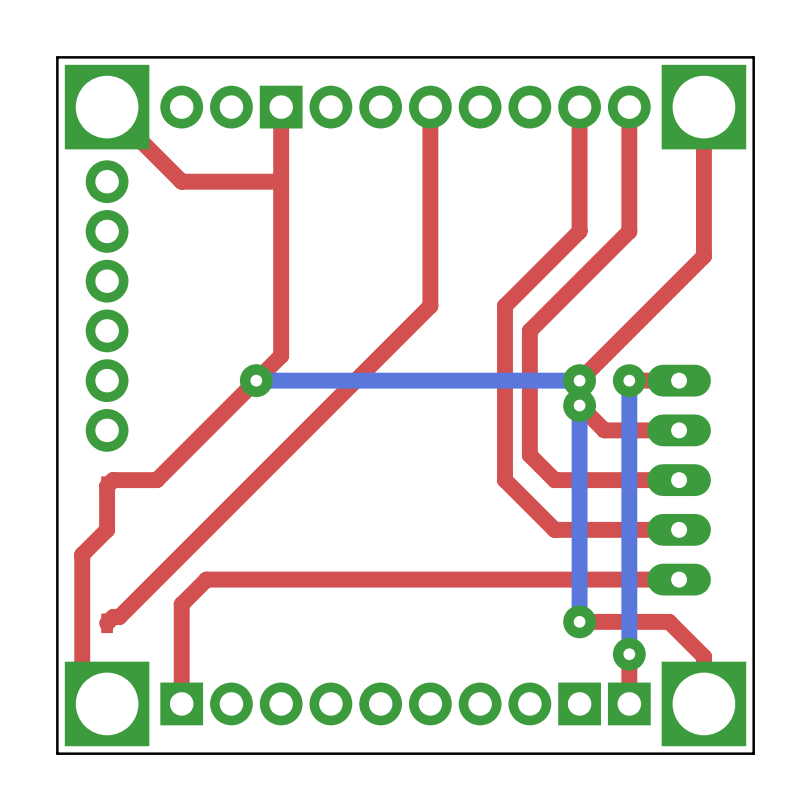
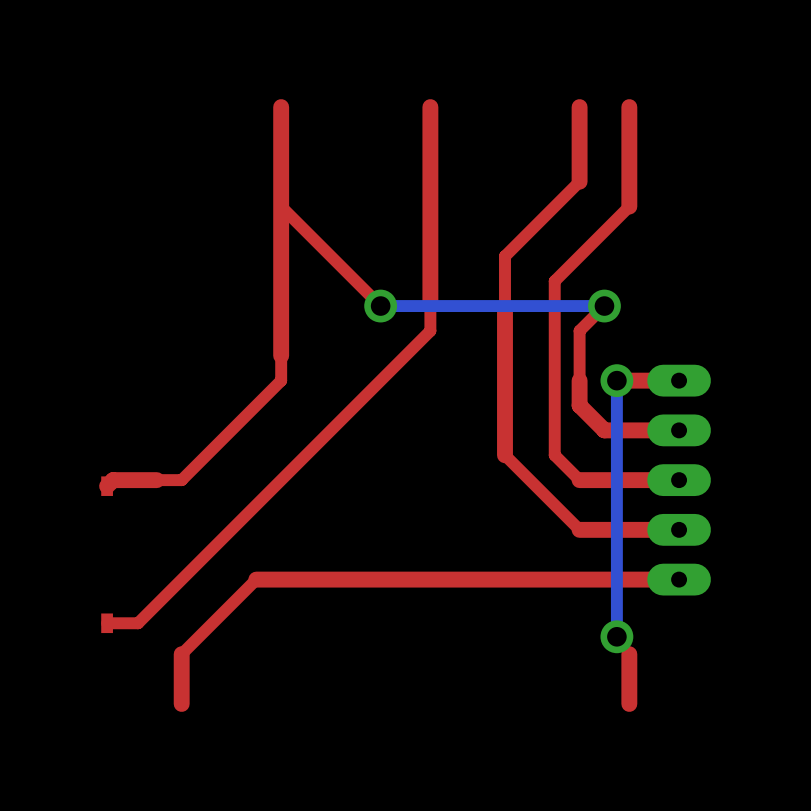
top track: (107, 107) (181, 181) (281, 181) -> none
top track: (703, 107) (703, 256) (579, 380) -> (604, 306) (579, 330) (579, 380)
top track: (579, 181) (579, 231) (504, 306) -> (579, 181) (504, 256) (504, 306)
top track: none -> (281, 206) (380, 306)
top track: (629, 206) (629, 231) (529, 330) (529, 455) (554, 480) (579, 480) -> (629, 206) (554, 281) (554, 455) (579, 480)
via: none -> (380, 306)
top track: (430, 306) (119, 616) (113, 616) (107, 623) -> (430, 306) (430, 330) (138, 623) (107, 623)
bottom track: none -> (604, 306) (380, 306)
via: none -> (604, 306)
top track: (281, 355) (156, 480) -> (281, 355) (281, 380) (181, 480) (156, 480)
via: (256, 380) -> none
bottom track: (579, 380) (256, 380) -> none
via: (579, 380) -> none
bottom track: none -> (616, 380) (616, 636)
bottom track: (629, 380) (629, 654) -> none
via position: (629, 380) -> (616, 380)
part: (405, 405) -> none
bottom track: (579, 405) (579, 621) -> none
via: (579, 405) -> none
top track: (504, 455) (504, 480) (554, 529) (579, 529) -> (504, 455) (579, 529)
top track: (107, 486) (107, 529) (82, 554) (82, 679) (107, 703) -> none
top track: (256, 579) (206, 579) (181, 604) (181, 654) -> (256, 579) (181, 654)
top track: (579, 621) (669, 621) (703, 656) (703, 703) -> none
via: (579, 621) -> none
via: none -> (616, 636)
via: (629, 654) -> none

